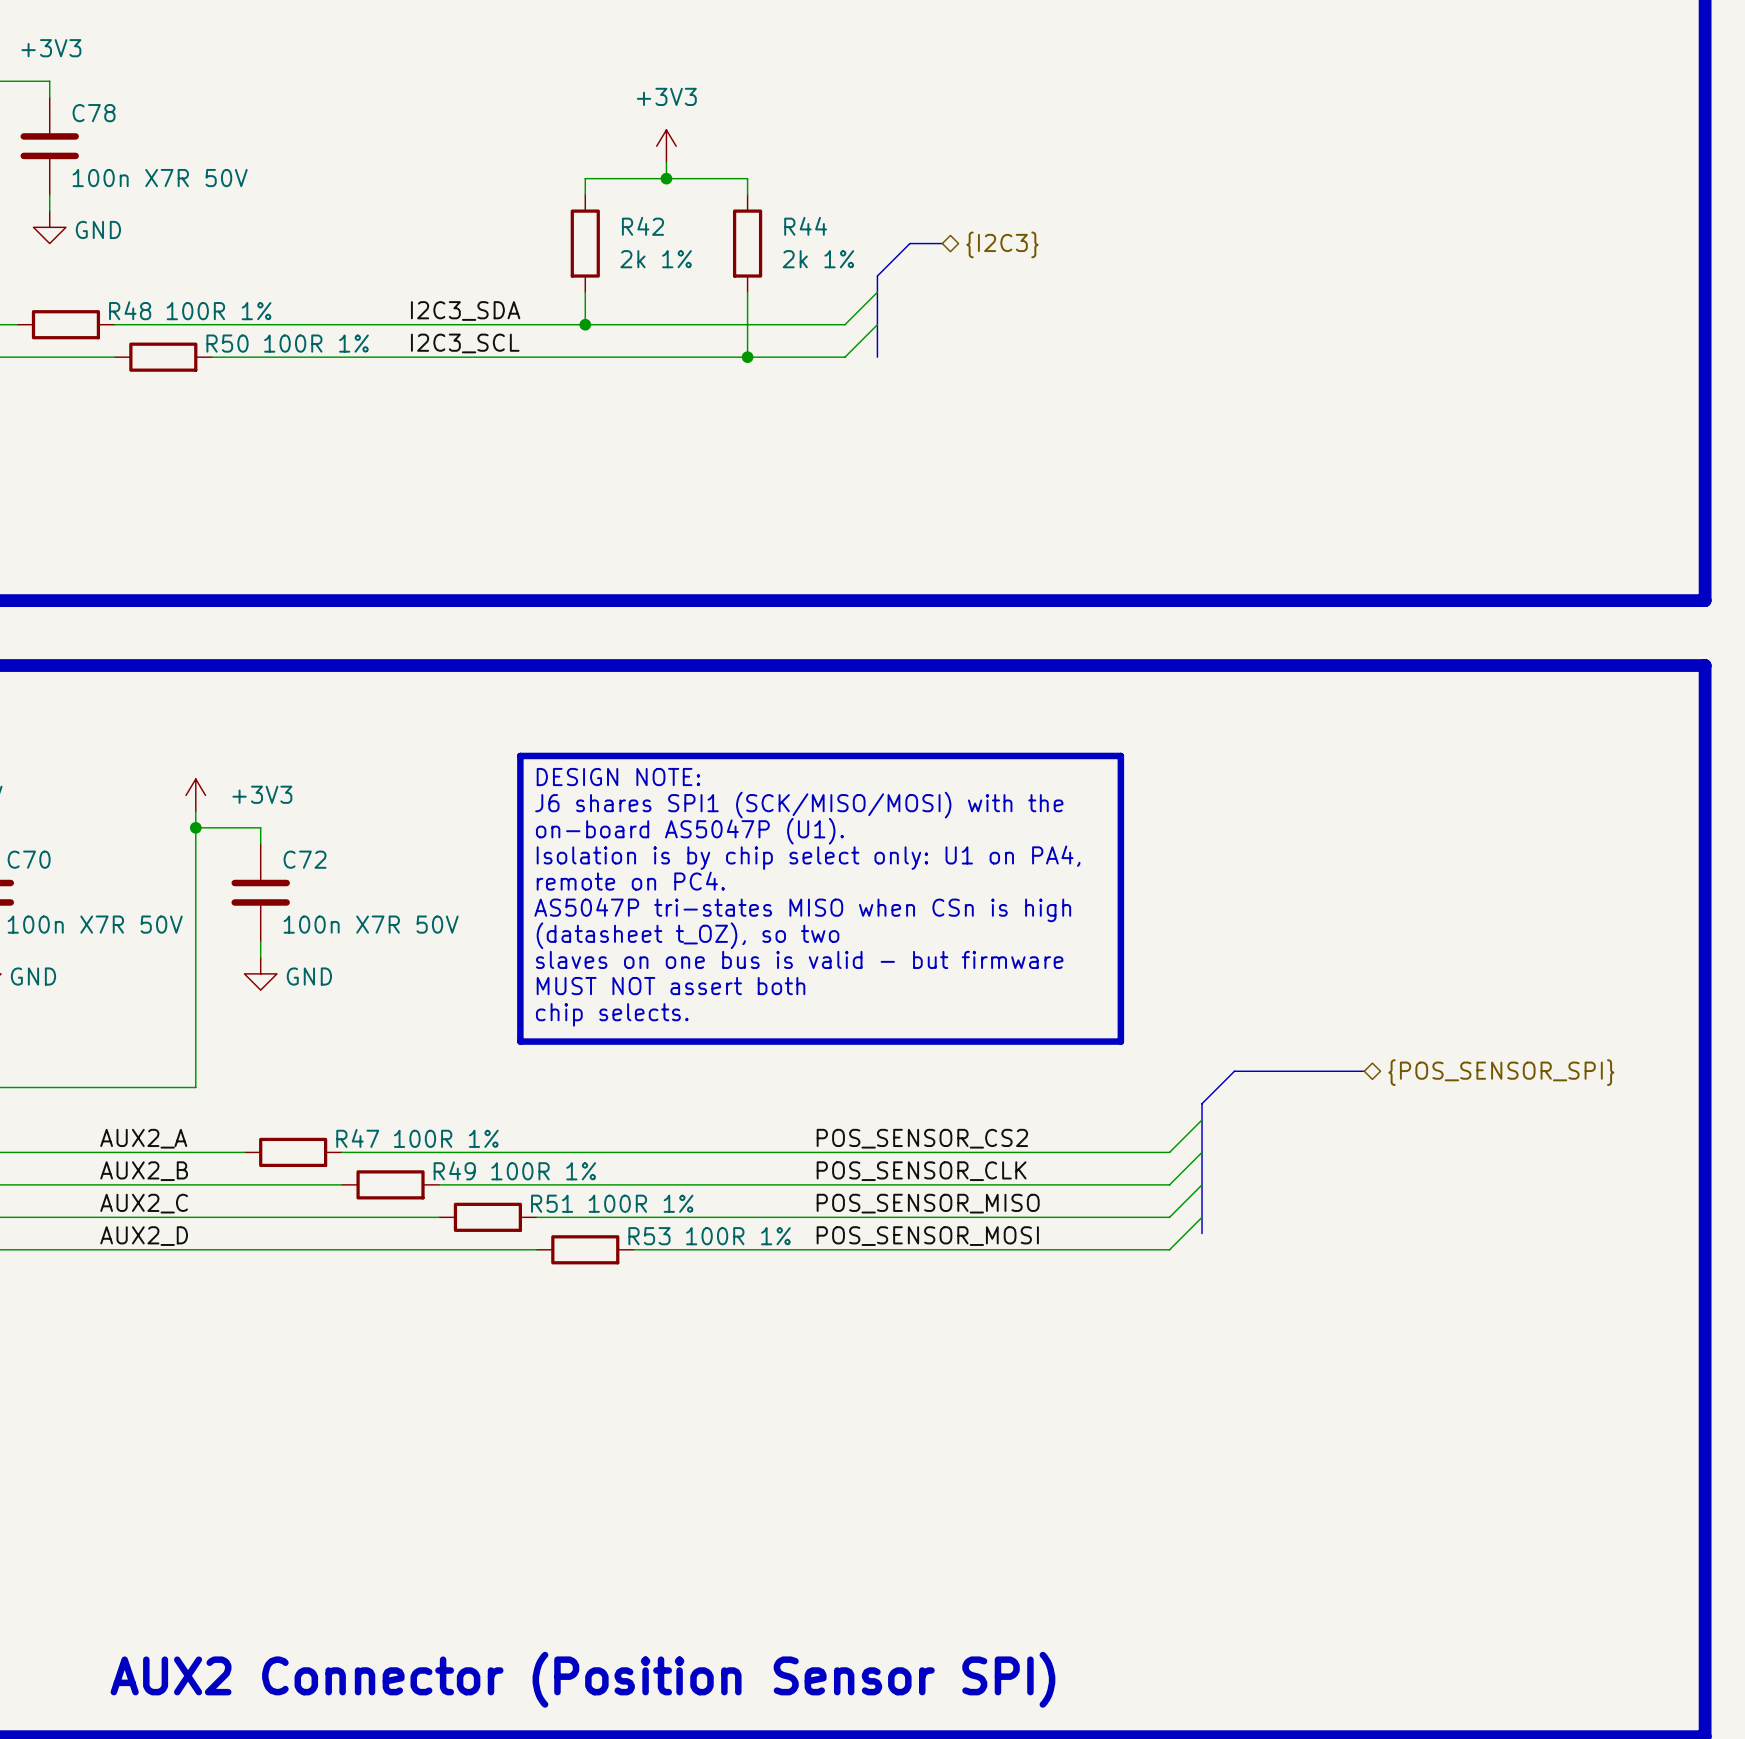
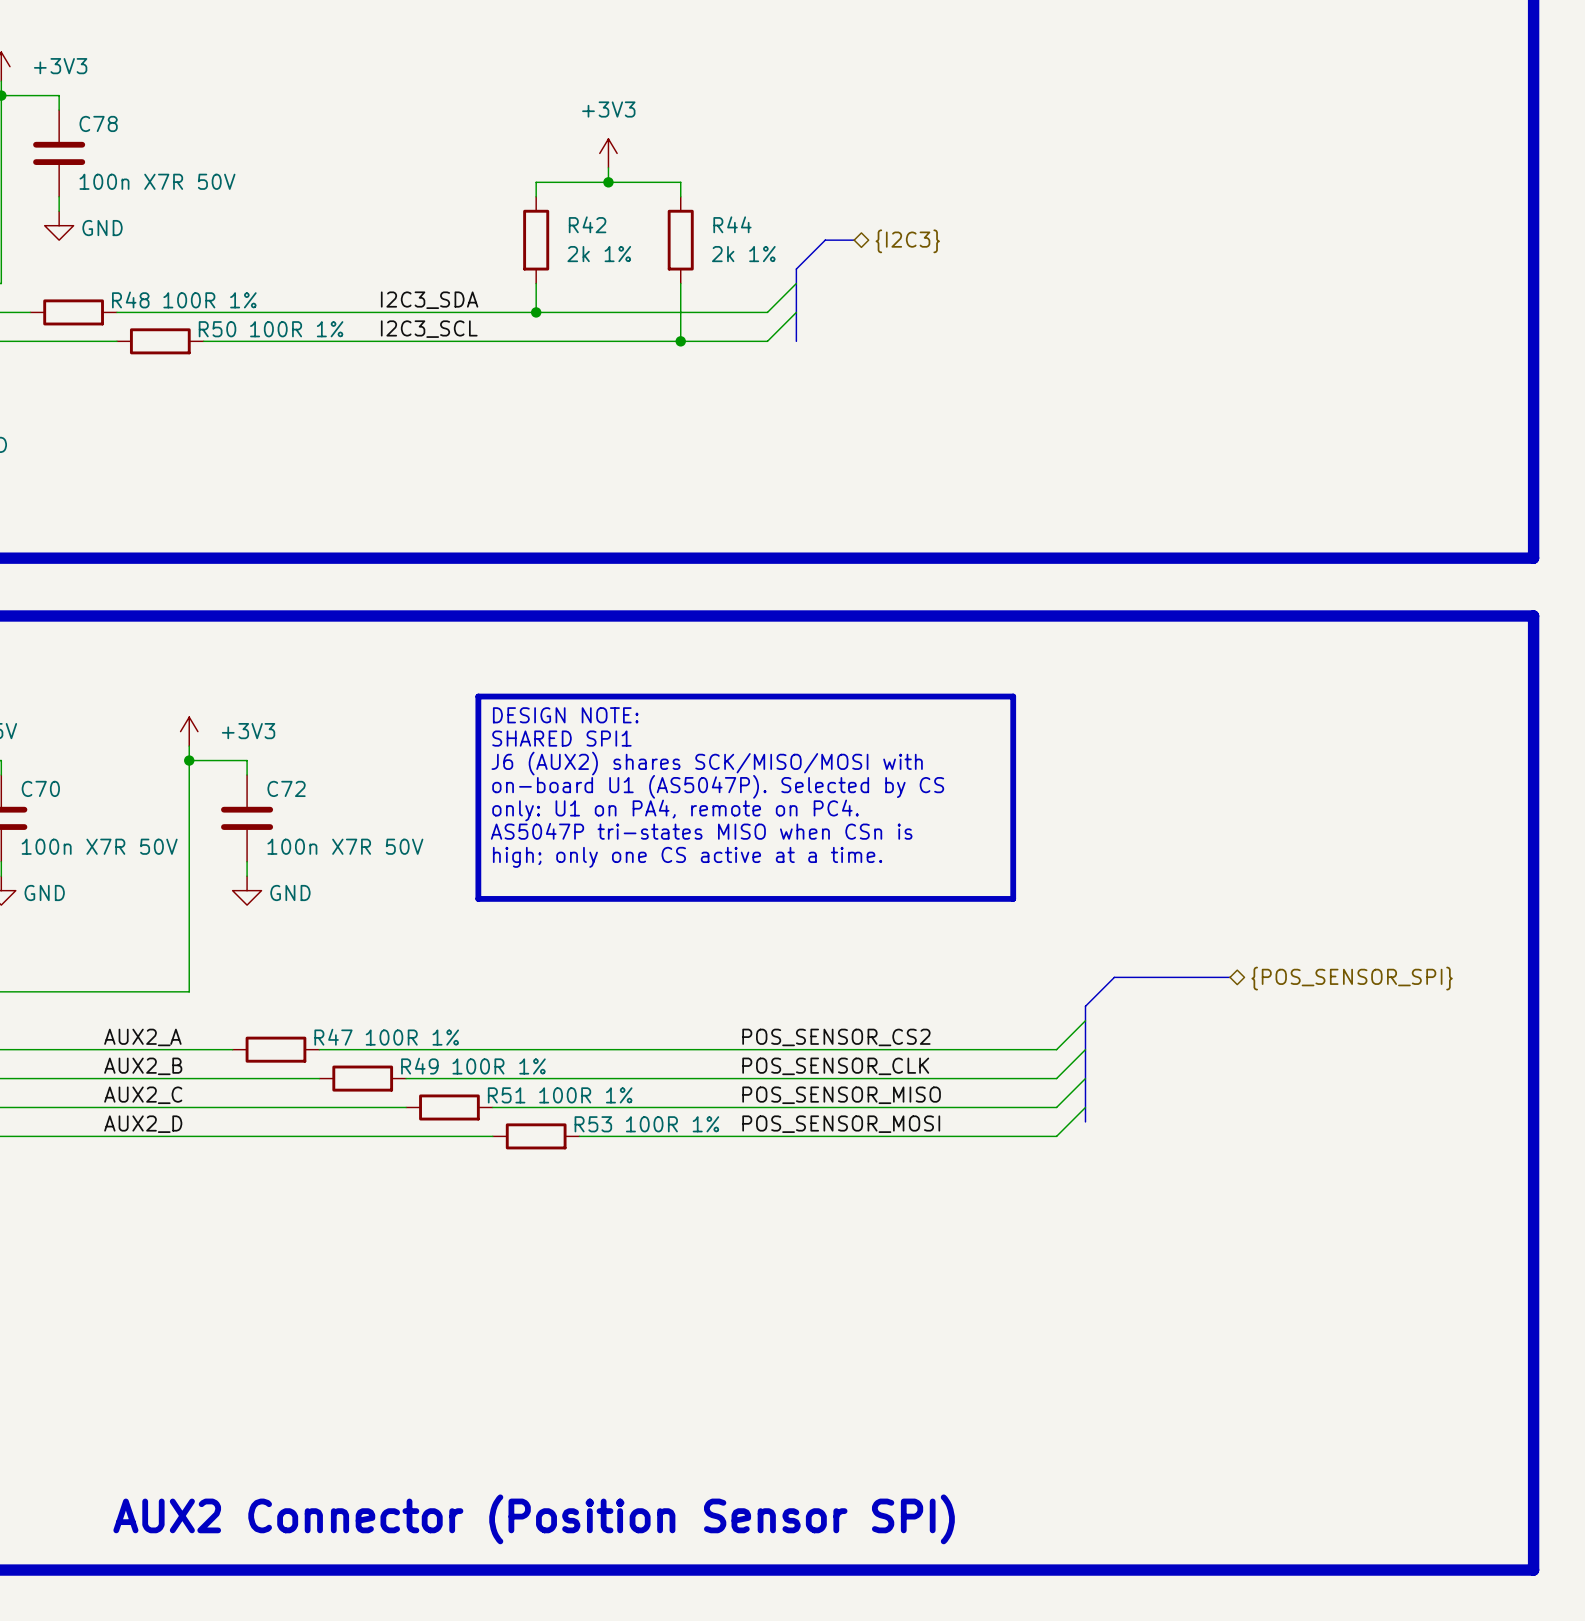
text: J6 shares SPI1 (SCK/MISO/MOSI) with the (799, 805) -> SHARED SPI1 (561, 738)
text: on-board AS5047P (U1). (689, 831) -> J6 (AUX2) shares SCK/MISO/MOSI with (707, 763)
text: Isolation is by chip select only: U1 on PA4, (808, 857) -> on-board U1 (AS5047P). Selected by CS (718, 786)
text: remote on PC4. (630, 881) -> only: U1 on PA4, remote on PC4. (675, 810)
text: AS5047P tri-states MISO when CSn is high (802, 909) -> AS5047P tri-states MISO when CSn is (701, 831)
text: (datasheet t_OZ), so two (688, 935) -> high; only one CS active at a time. (687, 857)
text: slaves on one bus is valid - but firmware (799, 959) -> none
line: (520, 983) (520, 1041) (1120, 1041) (1120, 983) -> (478, 898) (1013, 898)
text: MUST NOT assert both (671, 986) -> none
text: chip selects. (612, 1014) -> none

